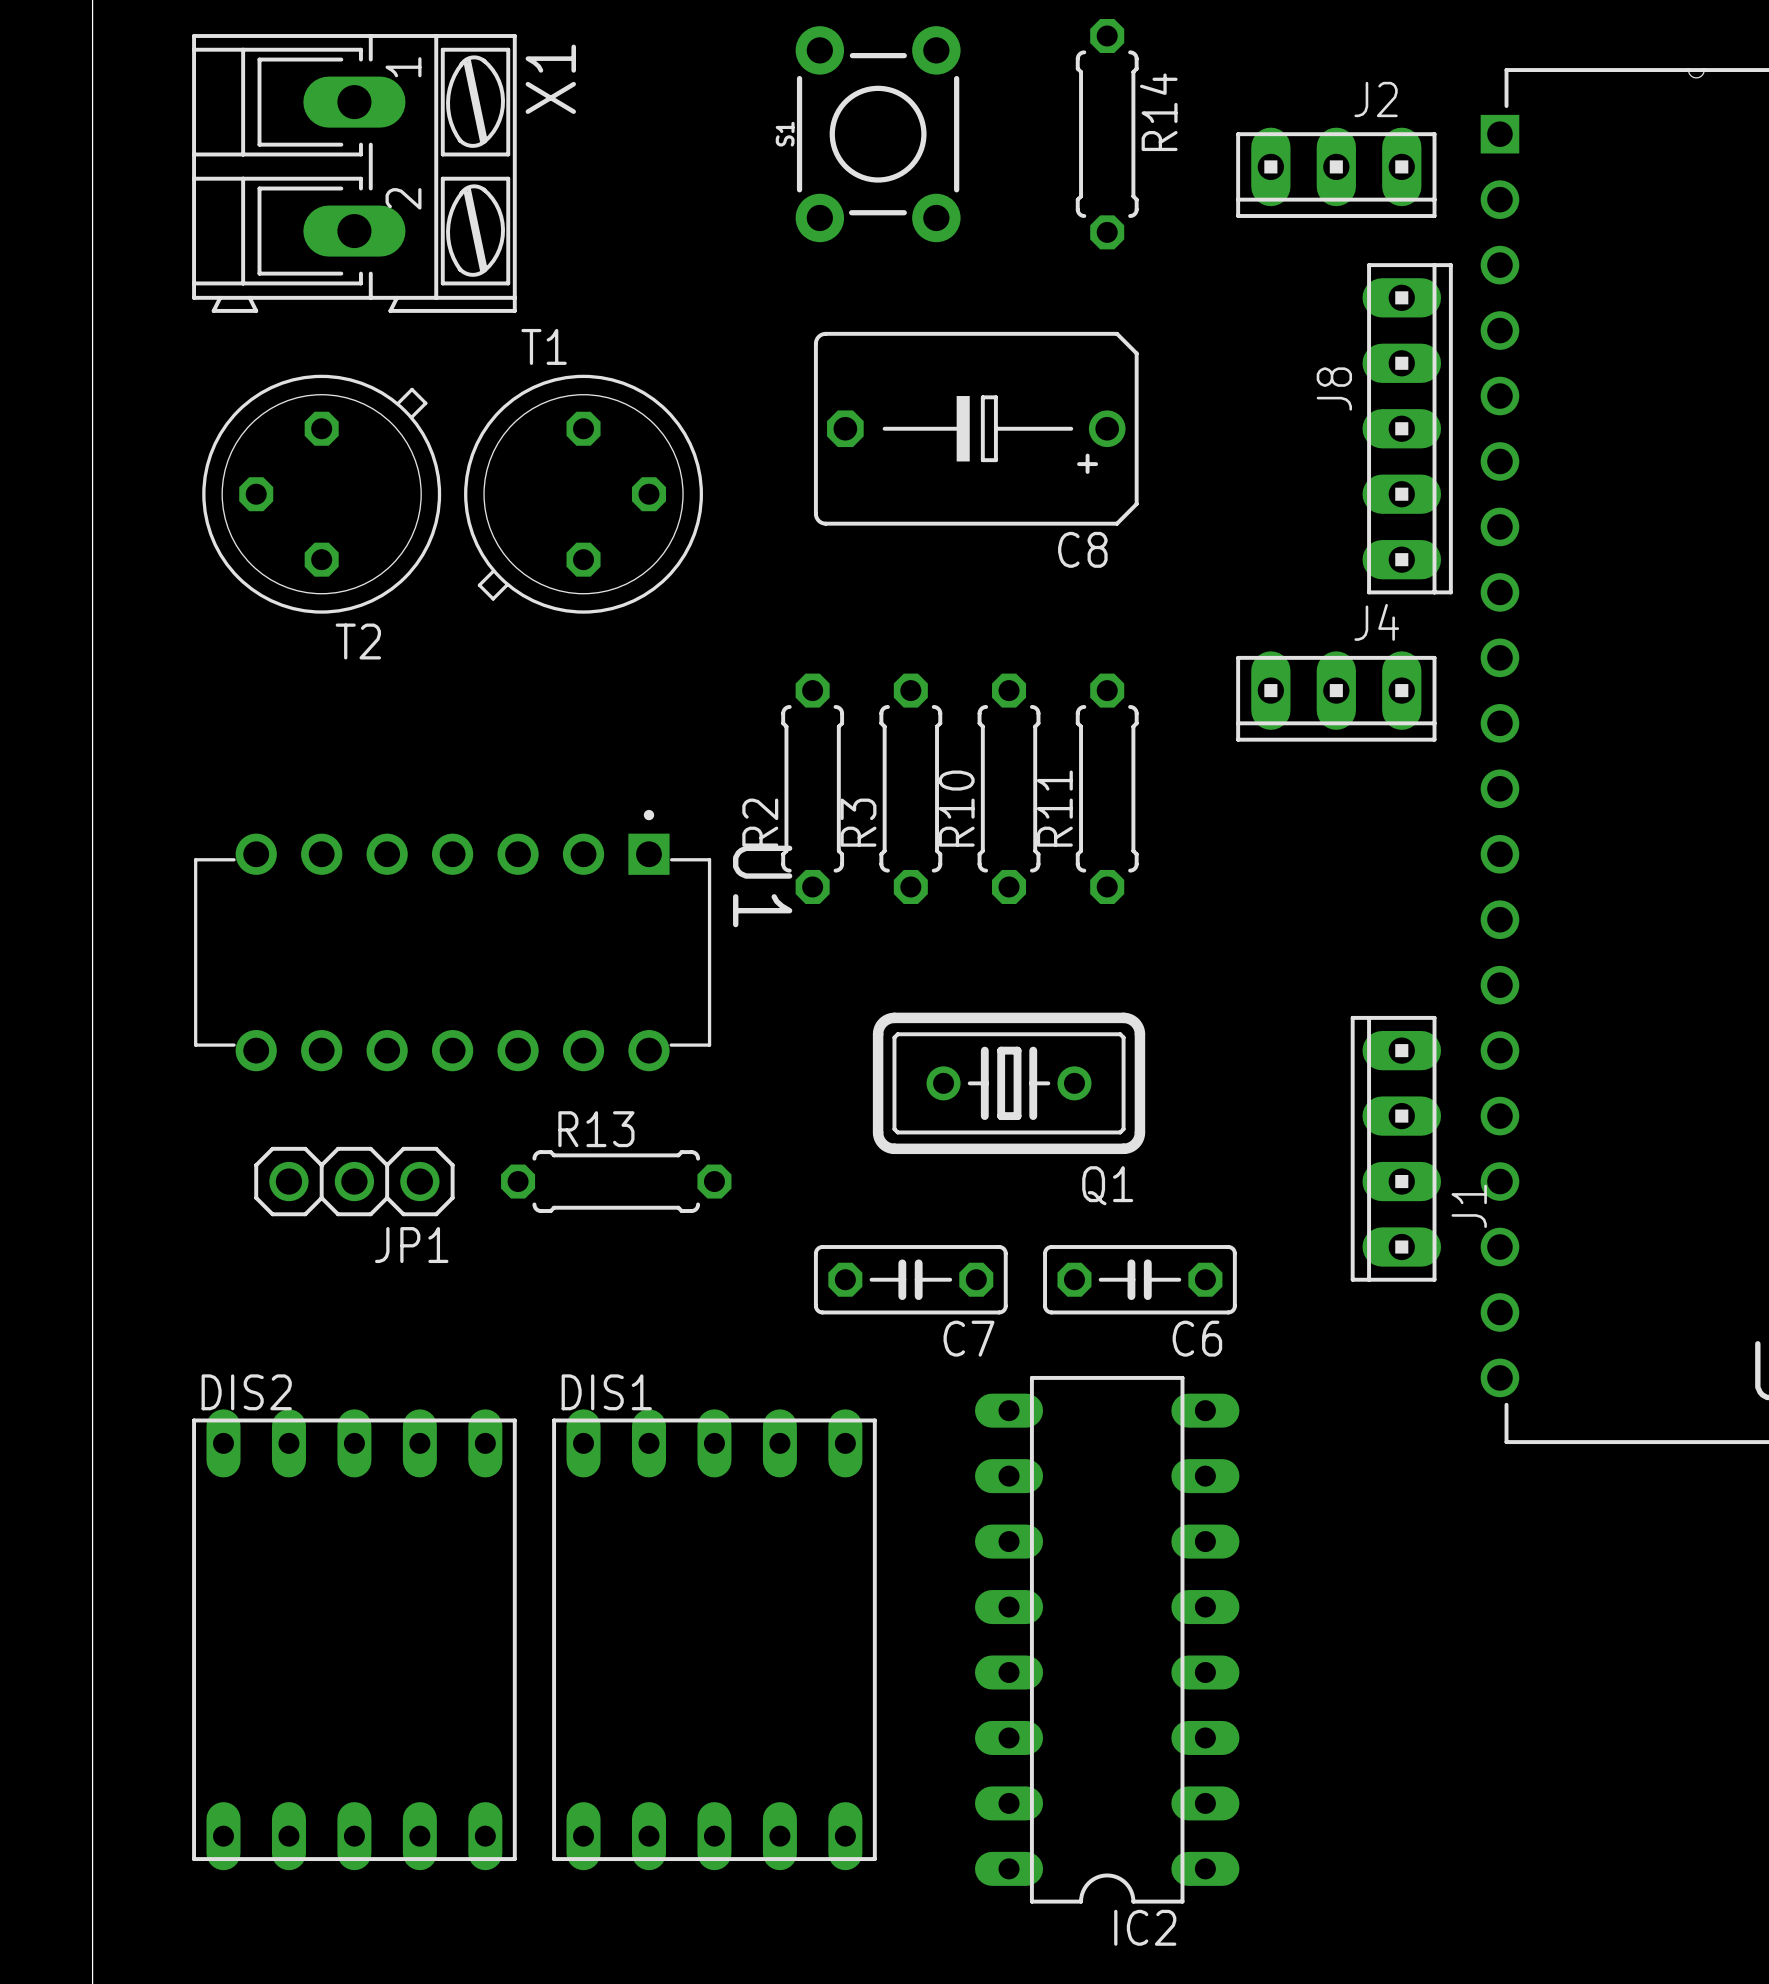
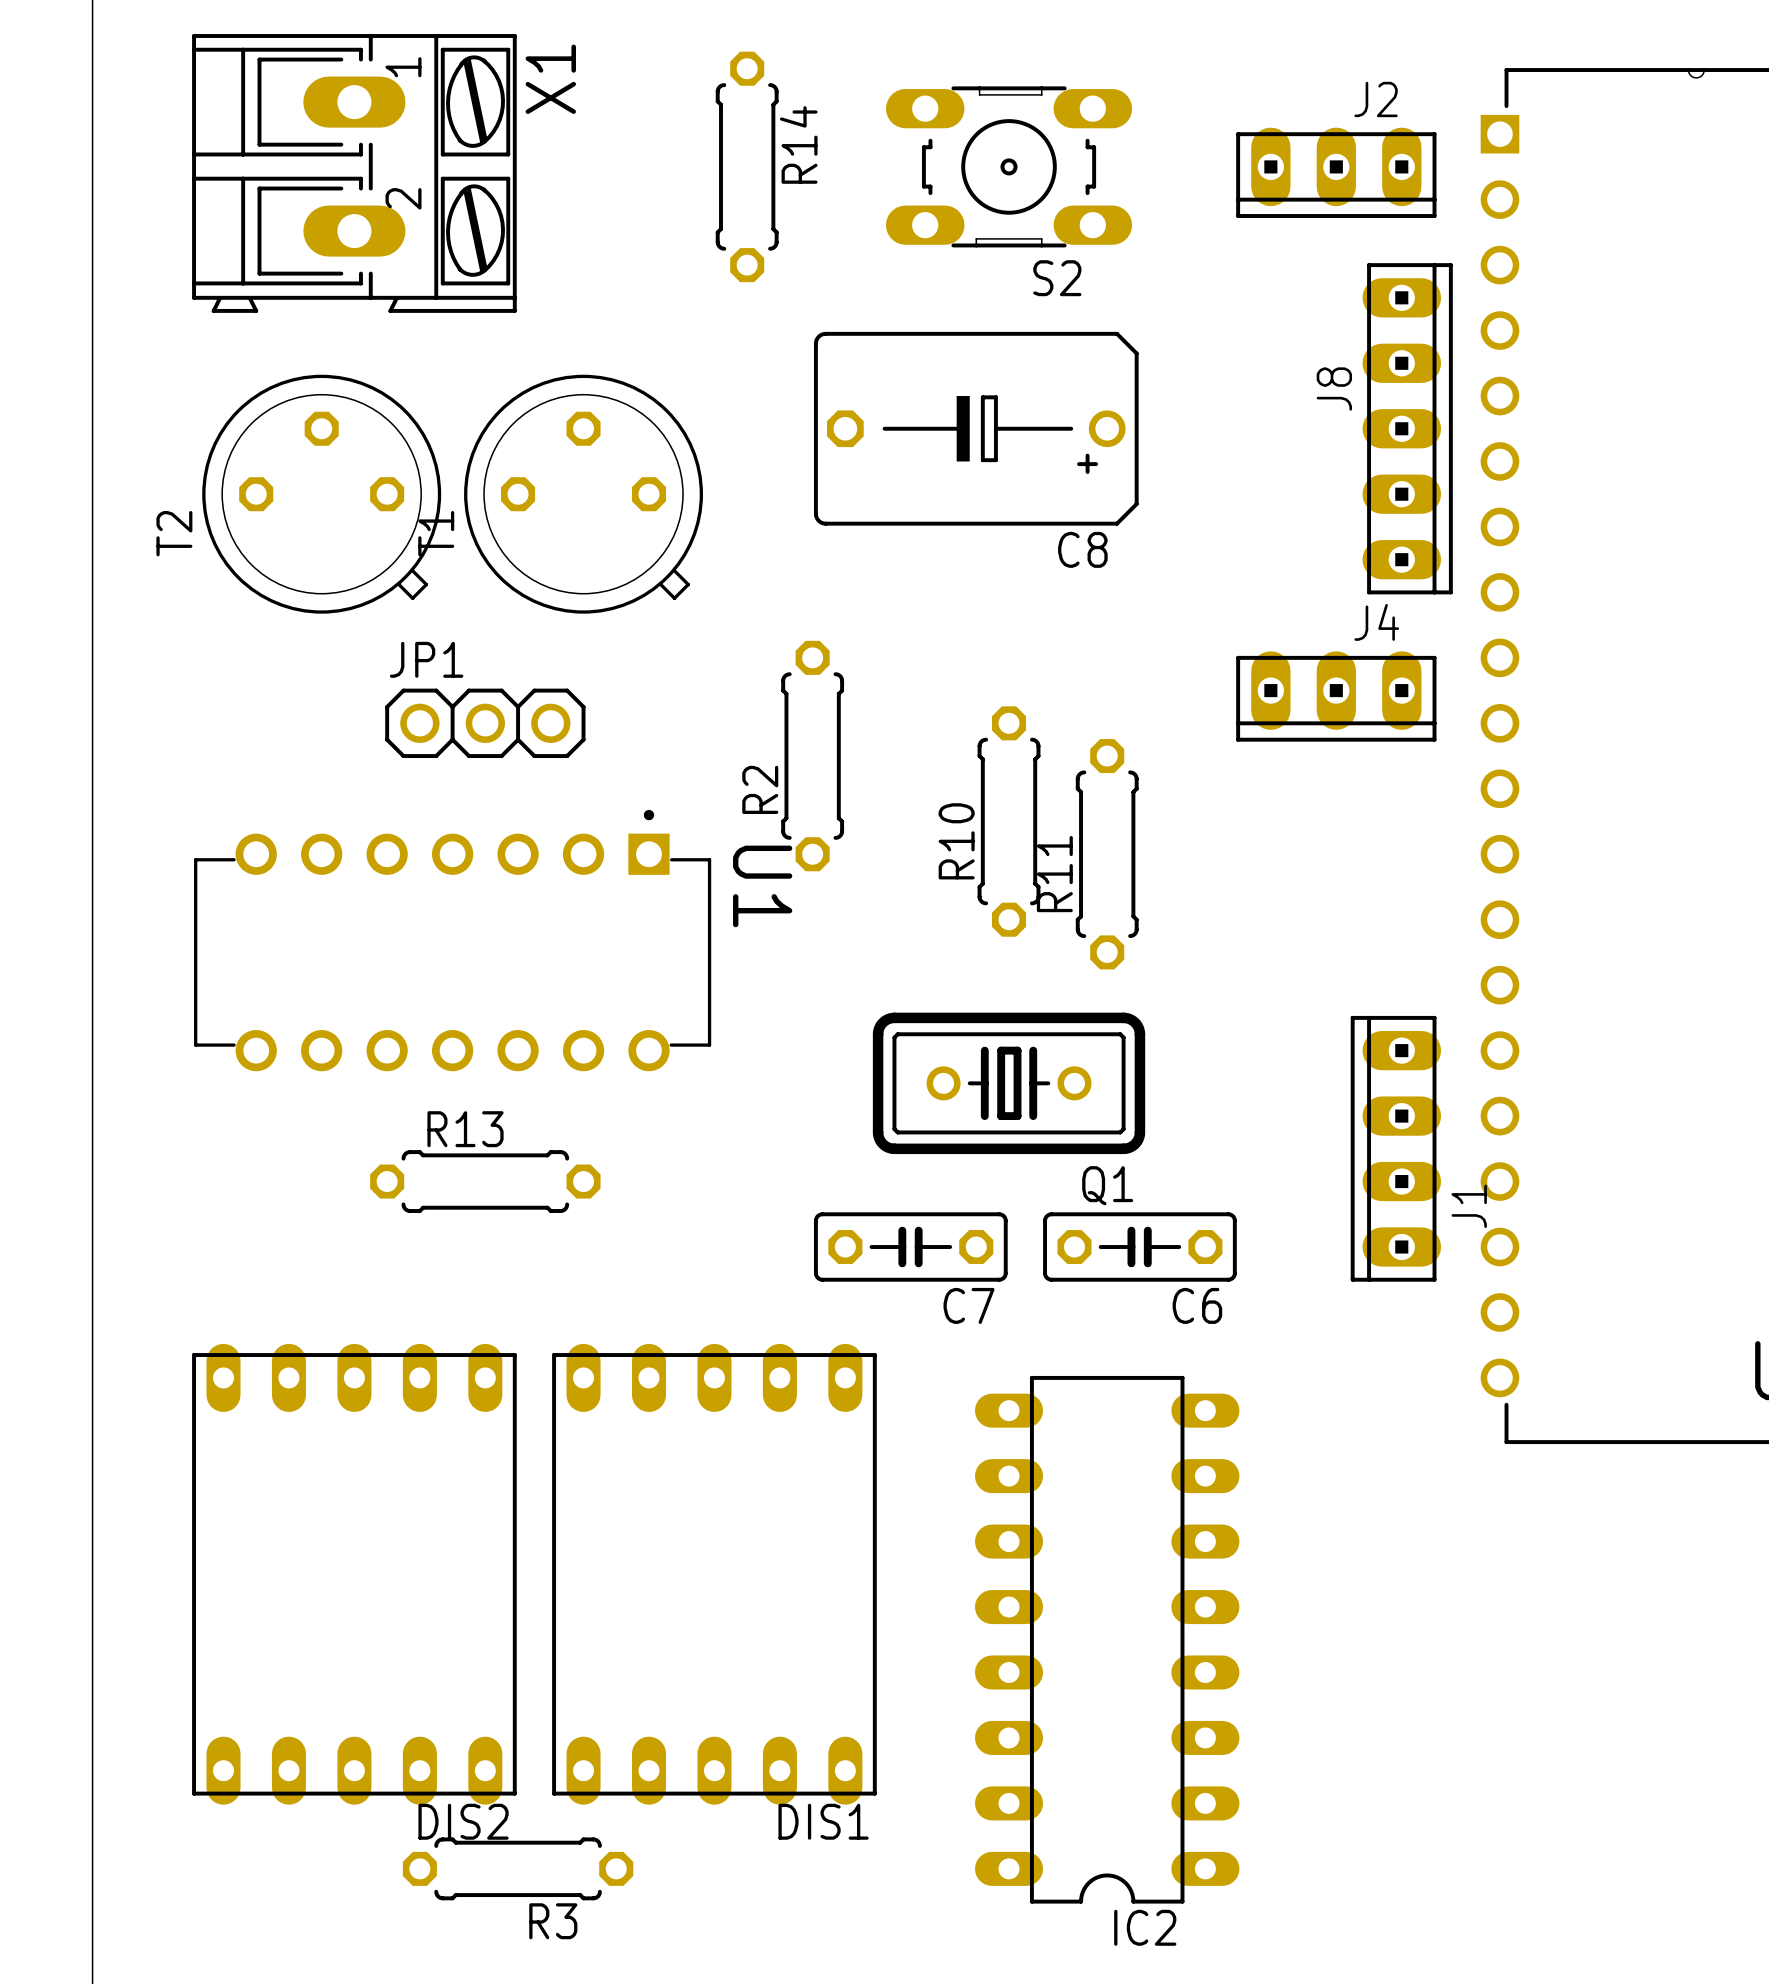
S1: (878, 134) -> none
R14 position: (1107, 134) -> (747, 166)
S2: none -> (1009, 166)
T2 rotation: 0° (321, 494) -> 90° clockwise (321, 494)
T1 rotation: 0° (583, 494) -> 90° counterclockwise (583, 494)
R2 position: (812, 788) -> (812, 756)
R3 rotation: 0° (910, 788) -> 90° clockwise (518, 1868)
R3 position: (910, 788) -> (518, 1868)
R10 position: (1009, 788) -> (1009, 821)
R11 position: (1107, 788) -> (1107, 854)
R3 name position: R3 (858, 822) -> R3 (553, 1921)
JP1 position: (354, 1181) -> (485, 723)
R13 position: (616, 1181) -> (485, 1181)
JP1 name position: JP1 (411, 1245) -> JP1 (426, 659)
C7 position: (910, 1279) -> (910, 1247)
C6 position: (1139, 1279) -> (1139, 1247)
DIS2 name position: DIS2 (246, 1392) -> DIS2 (463, 1821)
DIS1 name position: DIS1 (606, 1392) -> DIS1 (823, 1821)
DIS2 position: (354, 1639) -> (354, 1574)
DIS1 position: (714, 1639) -> (714, 1574)

